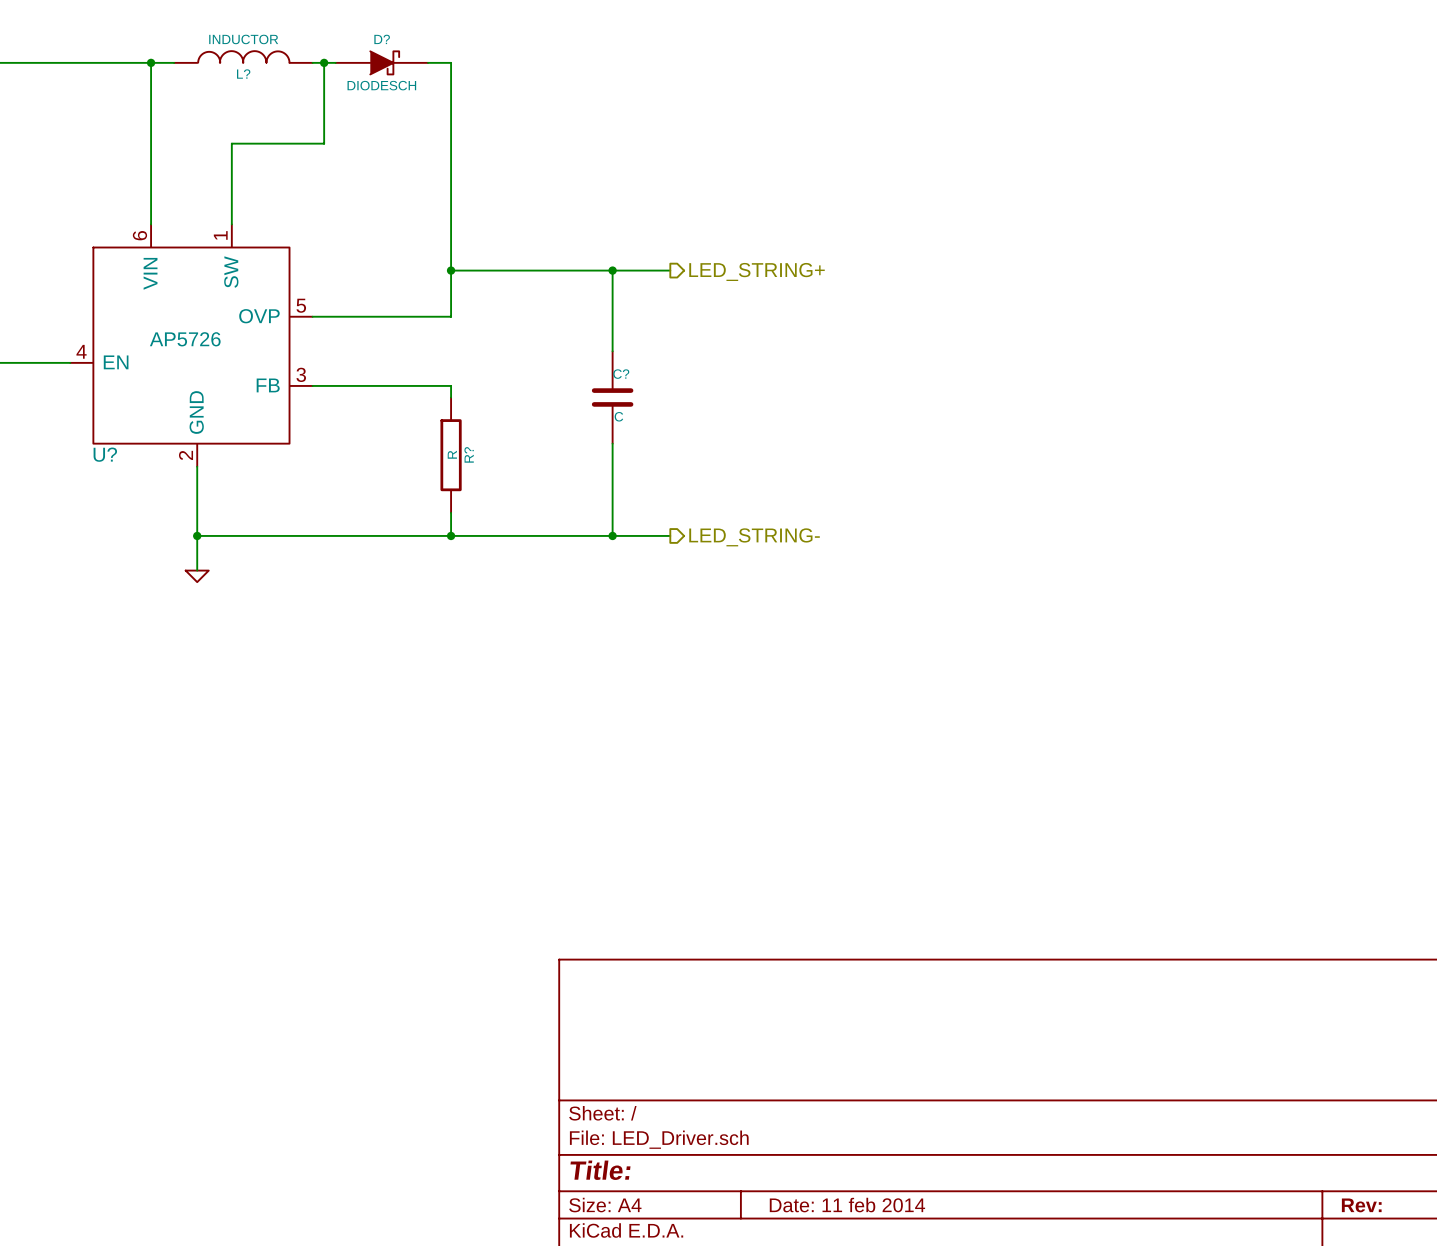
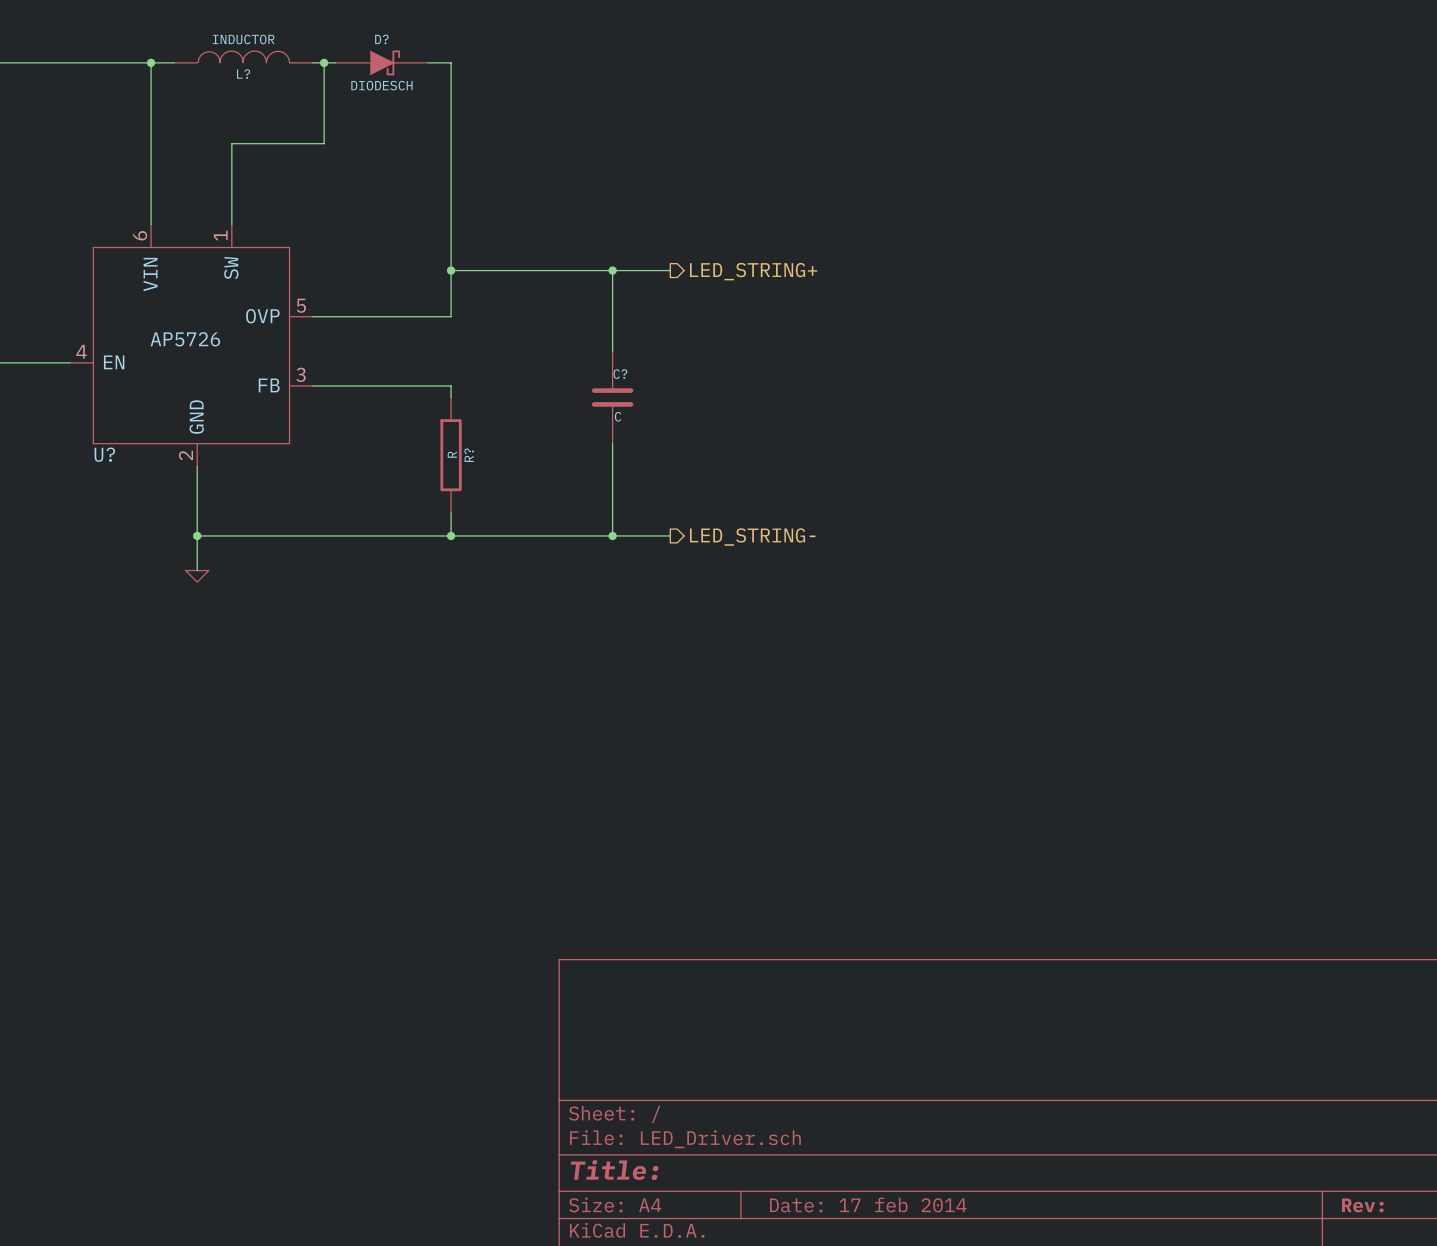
title block: Date: 11 feb 2014 (847, 1205) -> Date: 17 feb 2014 (868, 1205)

